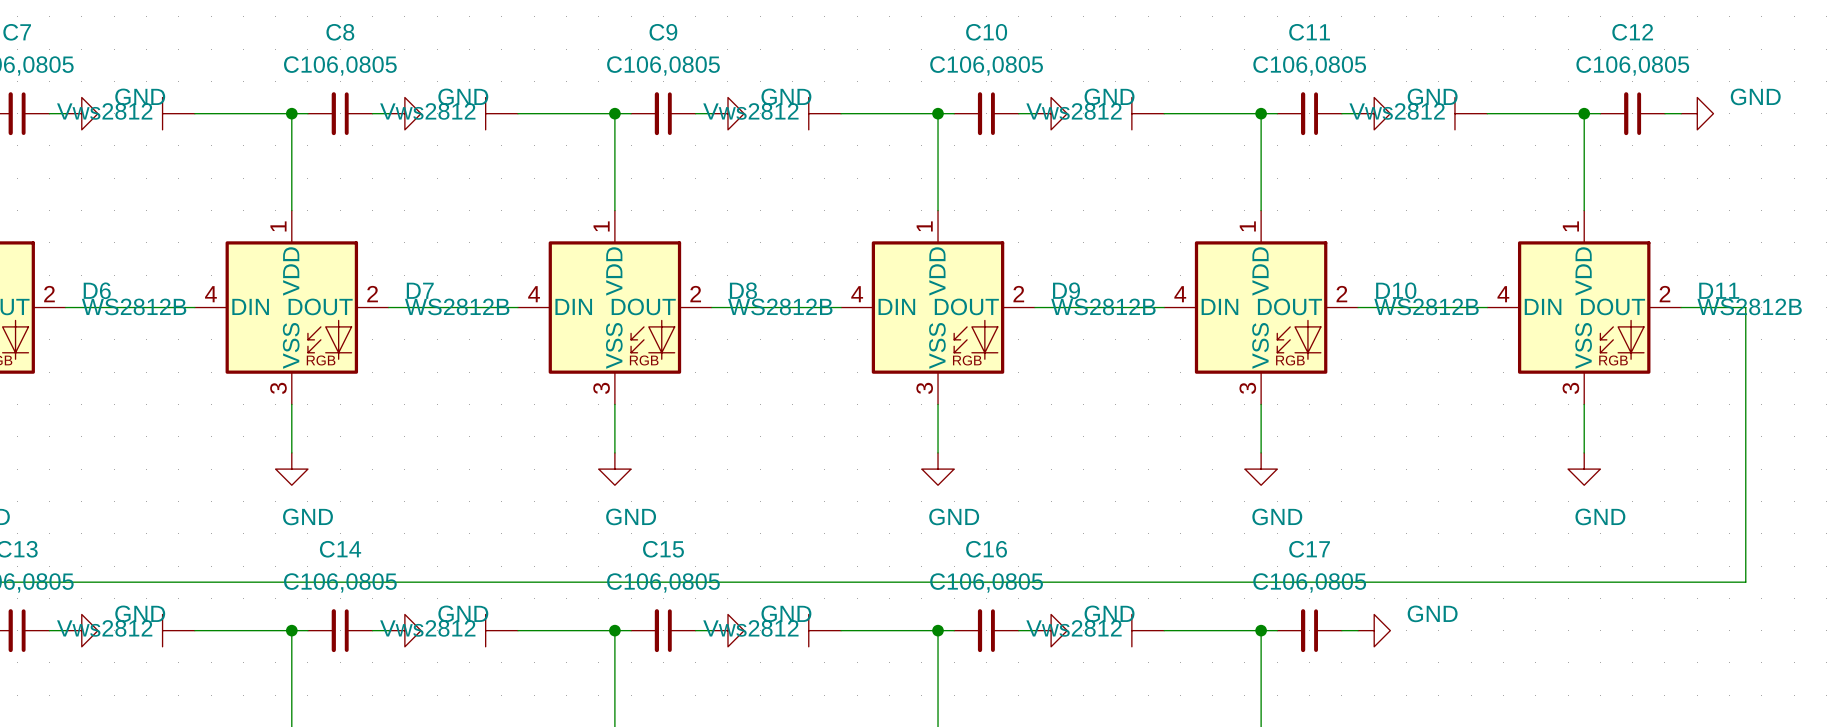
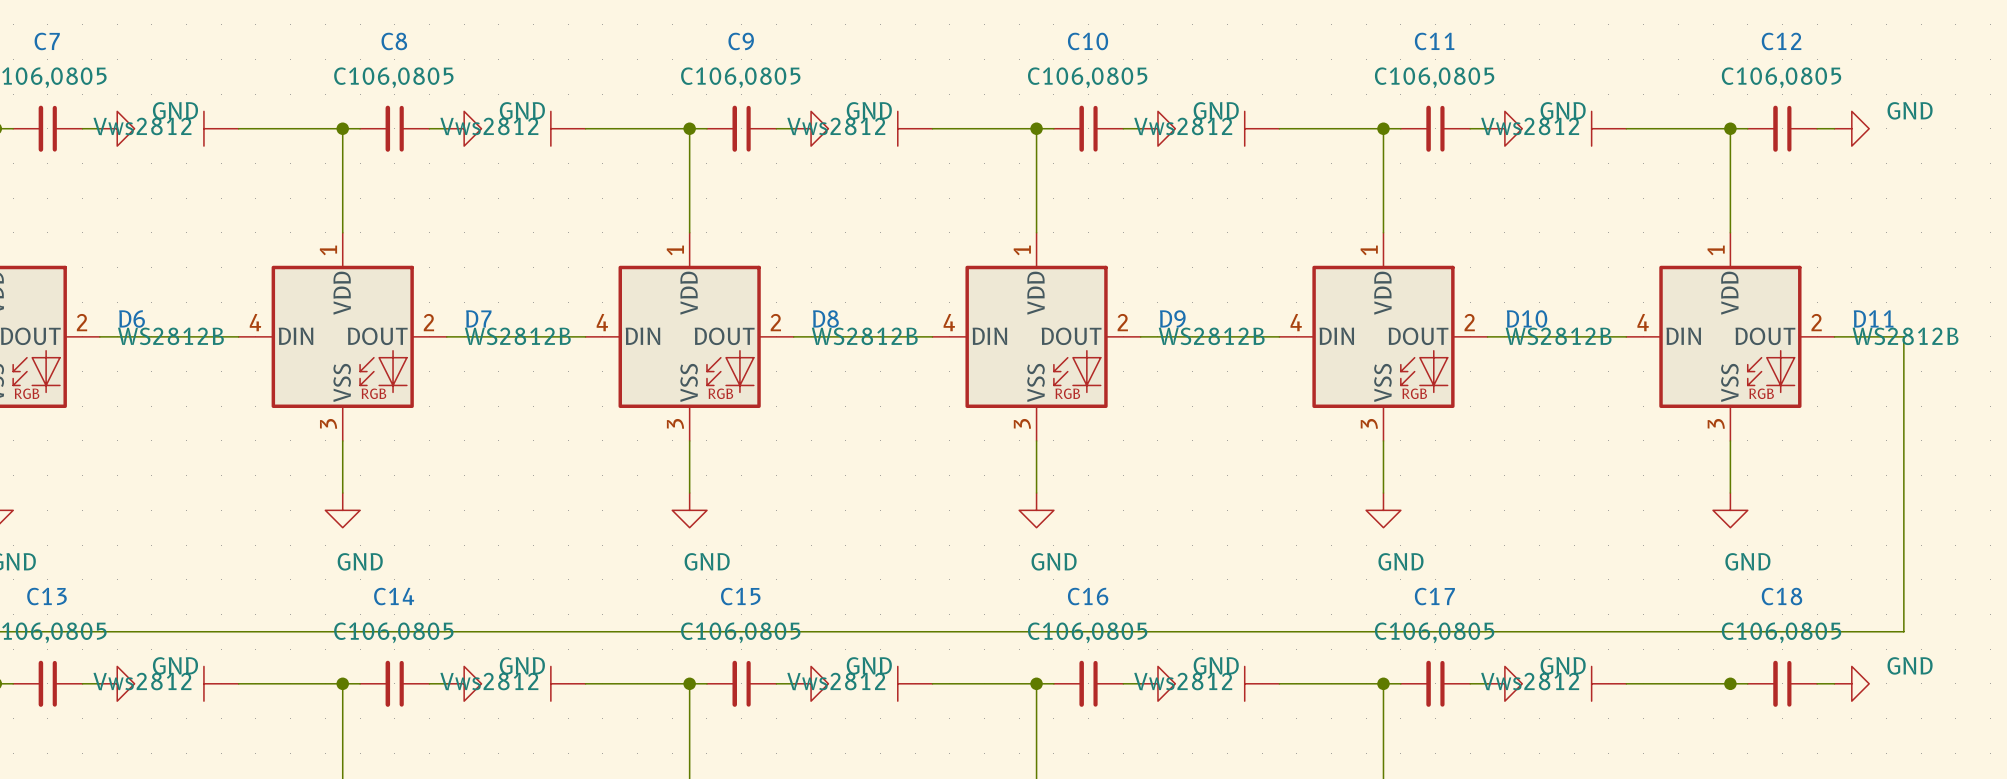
power symbol: none -> Vws2812 (1608, 683)
wire: none -> (1626, 683) (1747, 683)
junction: none -> (1730, 683)
C18: none -> C106,0805 (1782, 683)
wire: none -> (1817, 683) (1834, 683)
power symbol: none -> GND (1851, 683)

